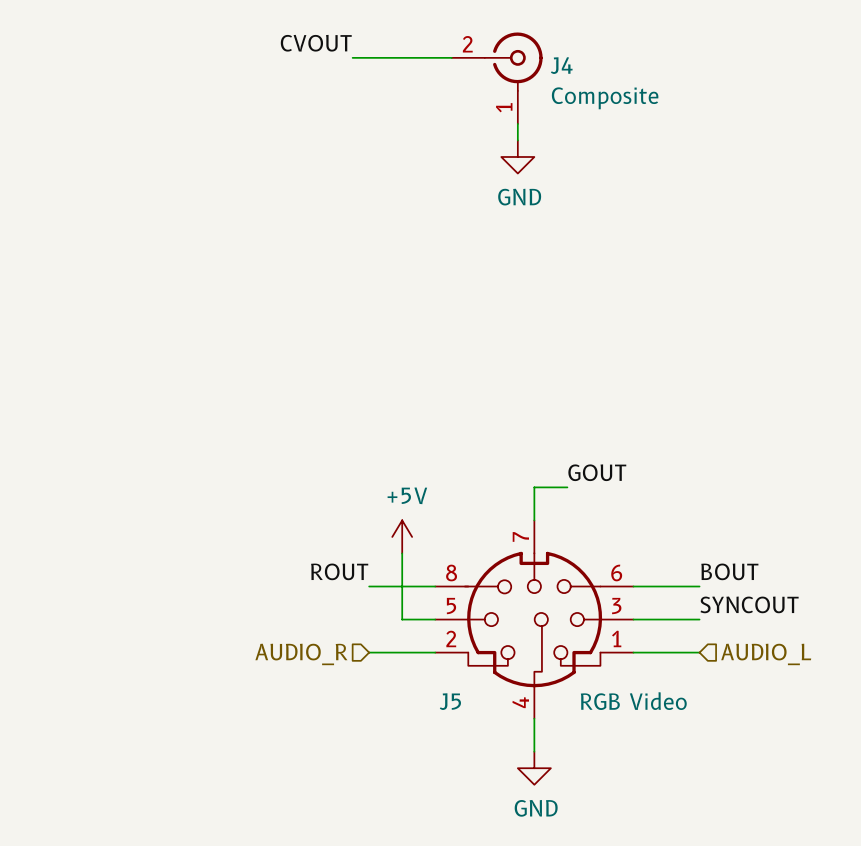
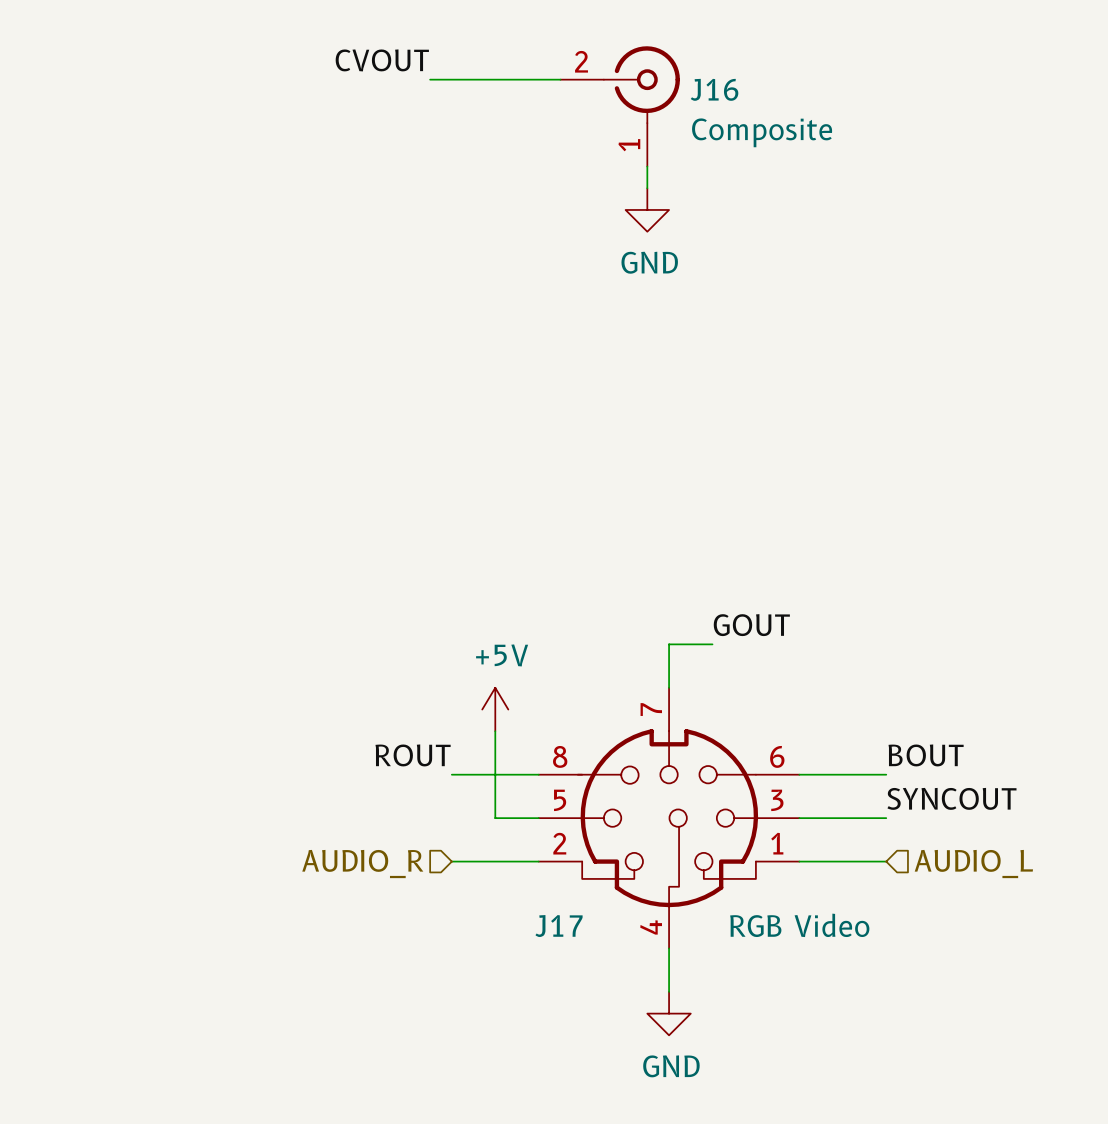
J4 name: J4 (561, 65) -> J16 (714, 89)
J5 name: J5 (450, 701) -> J17 (559, 926)

